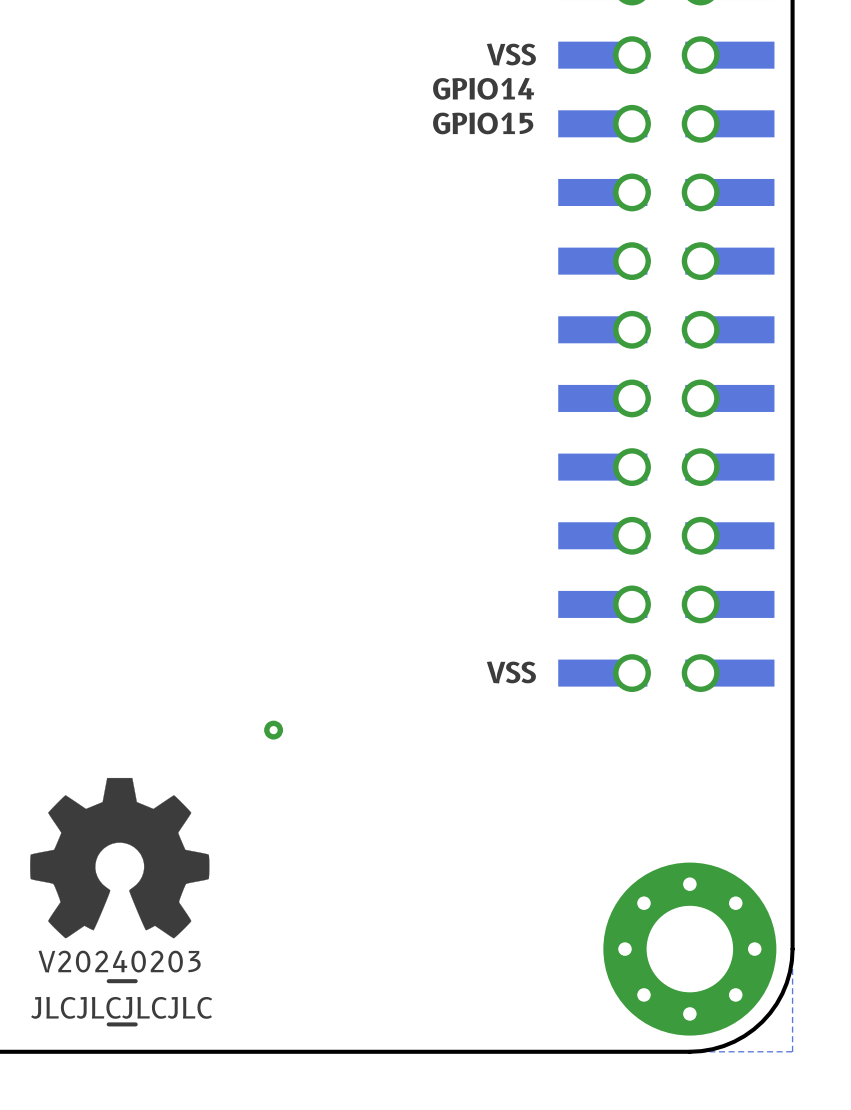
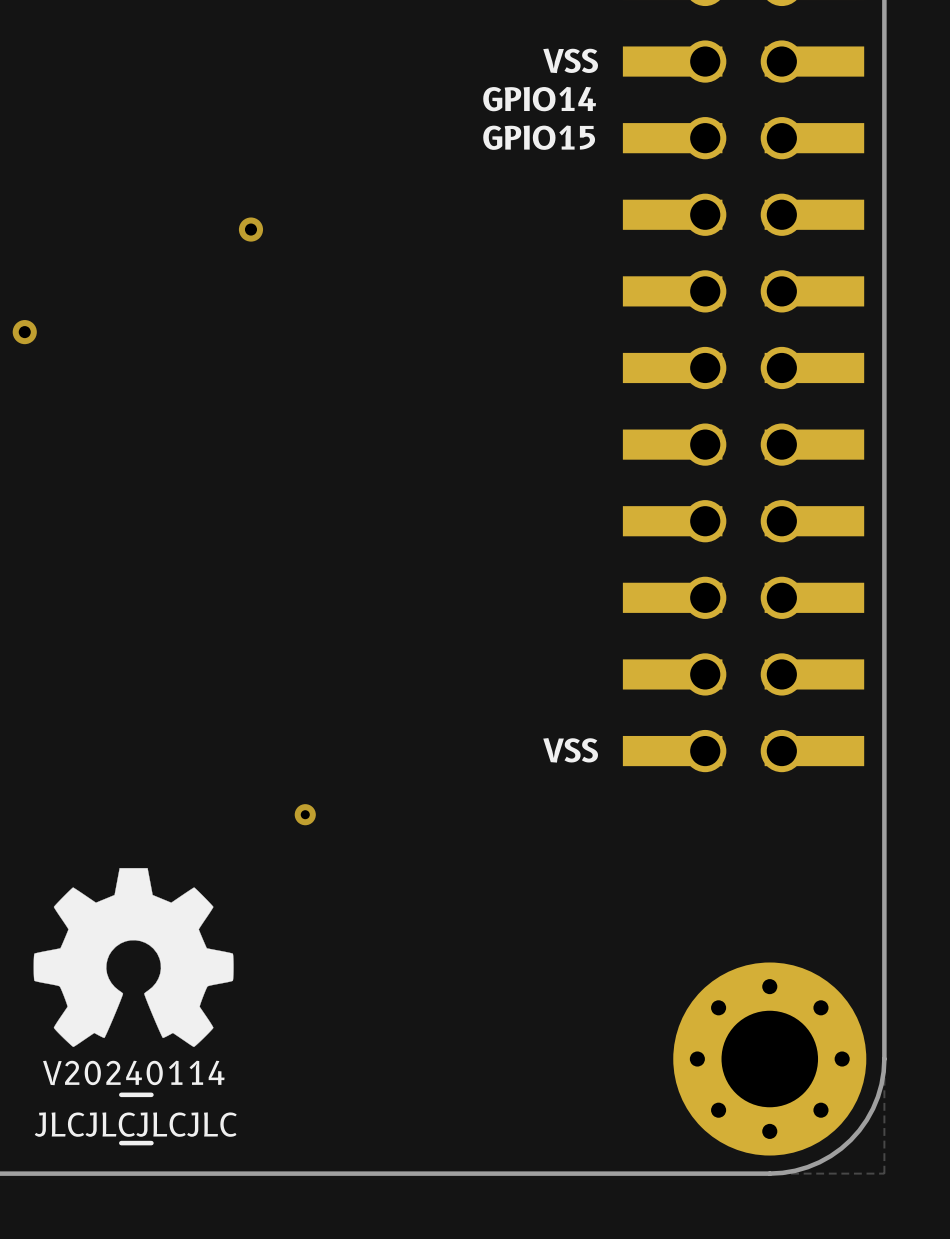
via: none -> (250, 229)
via: none -> (24, 332)
drawing shape: [38, 950, 201, 984] -> [43, 1060, 225, 1098]

